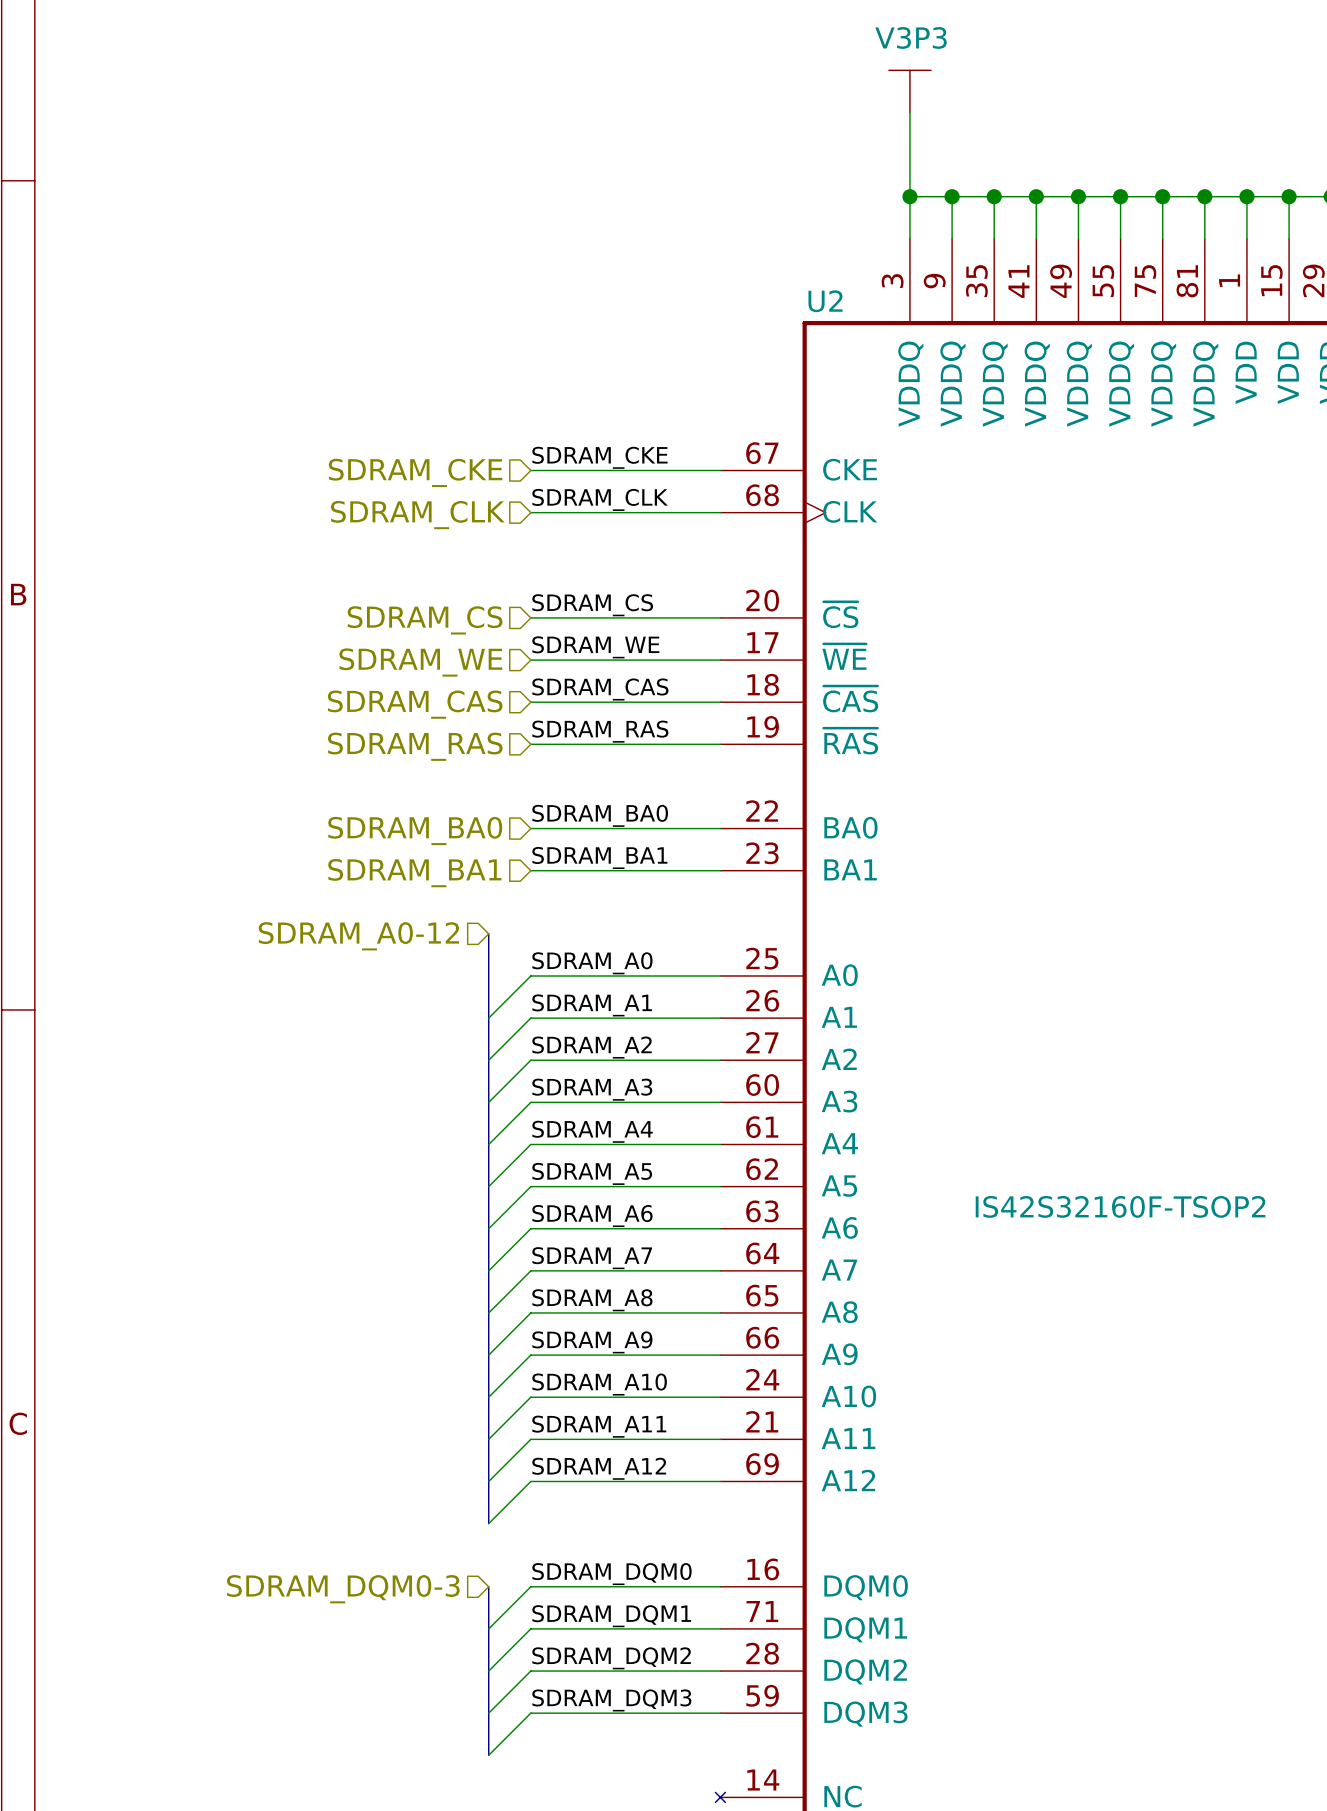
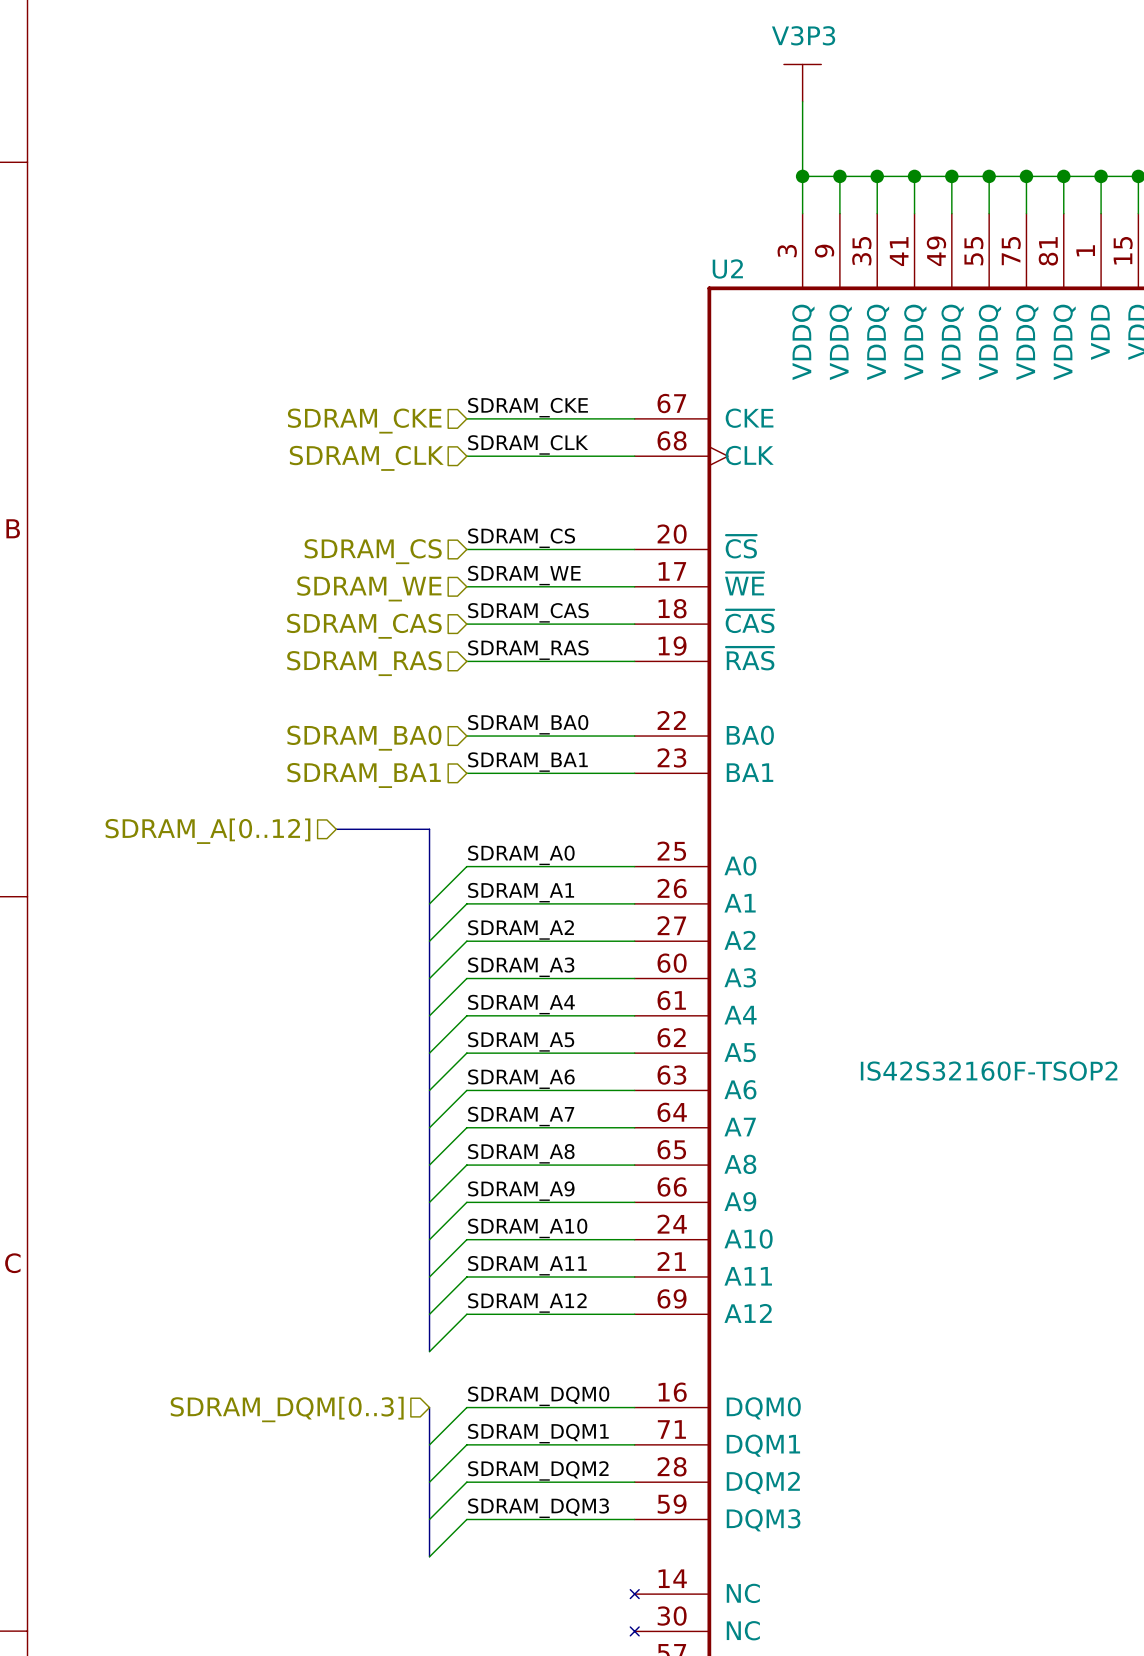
bus: none -> (336, 829) (429, 829)
hierarchical label: SDRAM_A0-12 (358, 936) -> SDRAM_A[0..12] (207, 831)
hierarchical label: SDRAM_DQM0-3 (343, 1589) -> SDRAM_DQM[0..3] (287, 1409)

